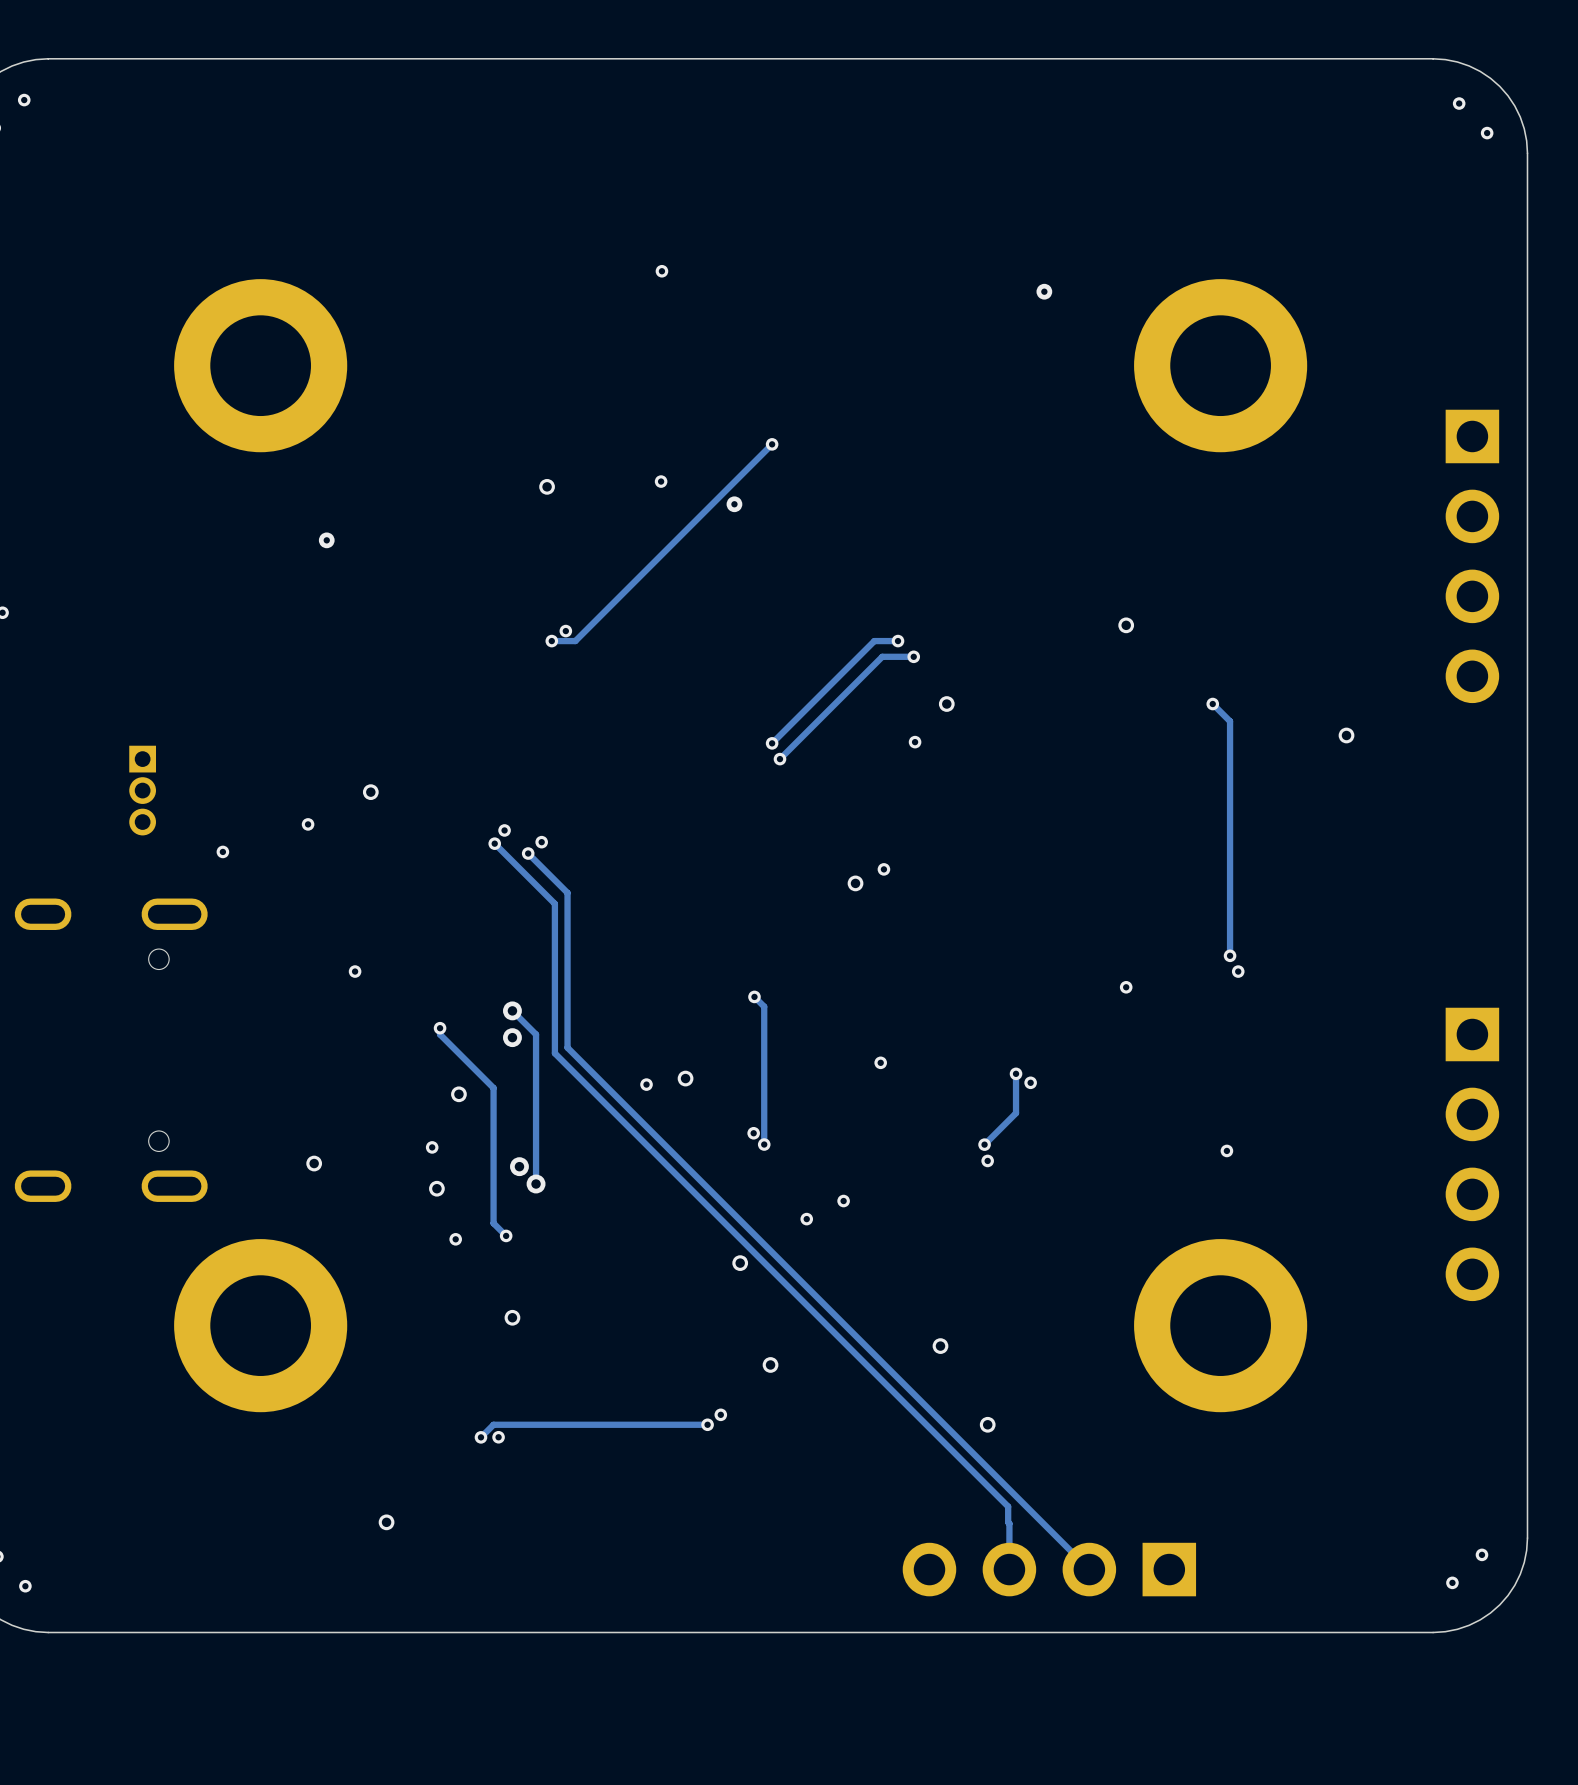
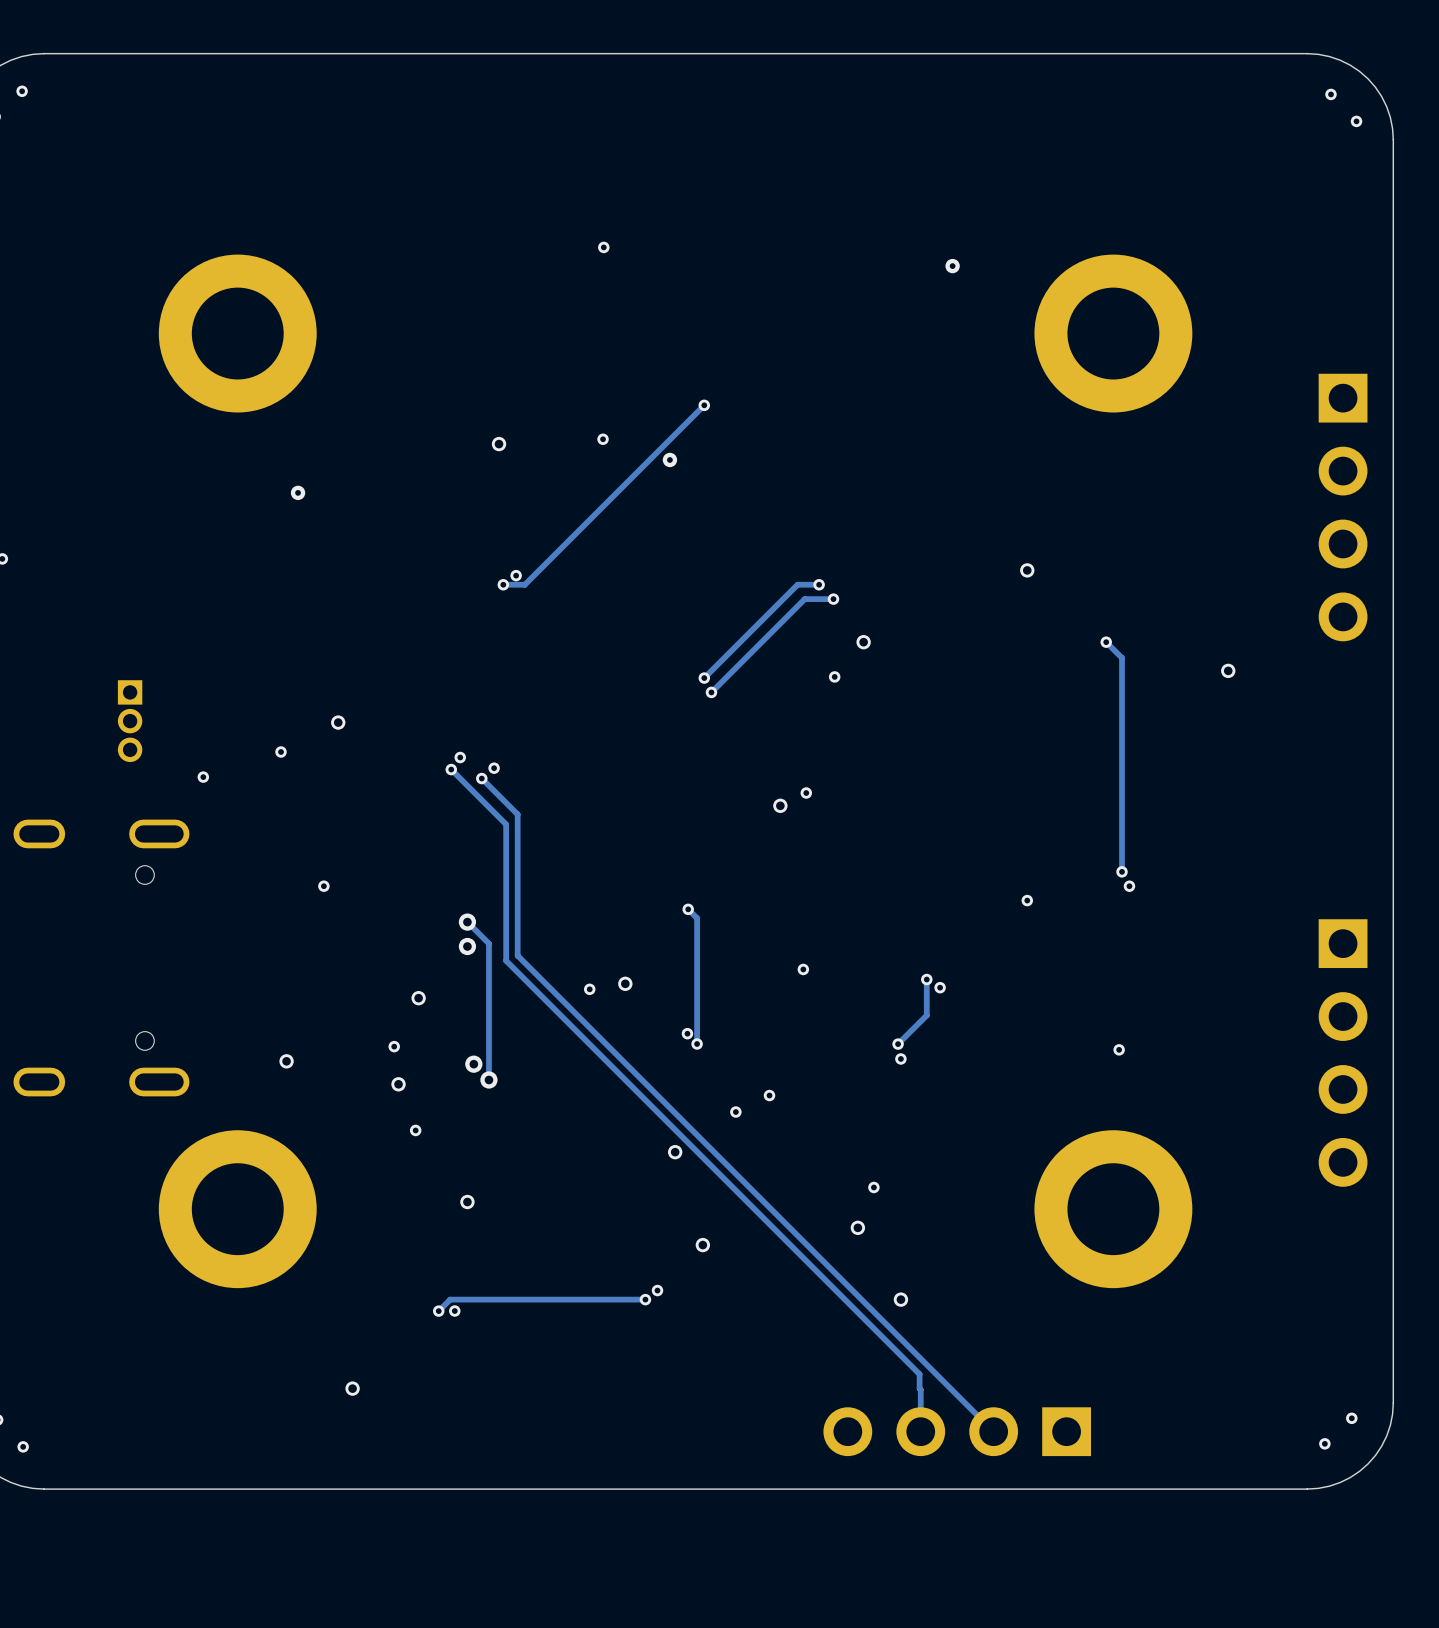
track: (440, 1028) (440, 1034) (493, 1088) (493, 1223) (506, 1235) -> none
via: (440, 1028) -> none
via: (506, 1235) -> none
via: none -> (873, 1187)

